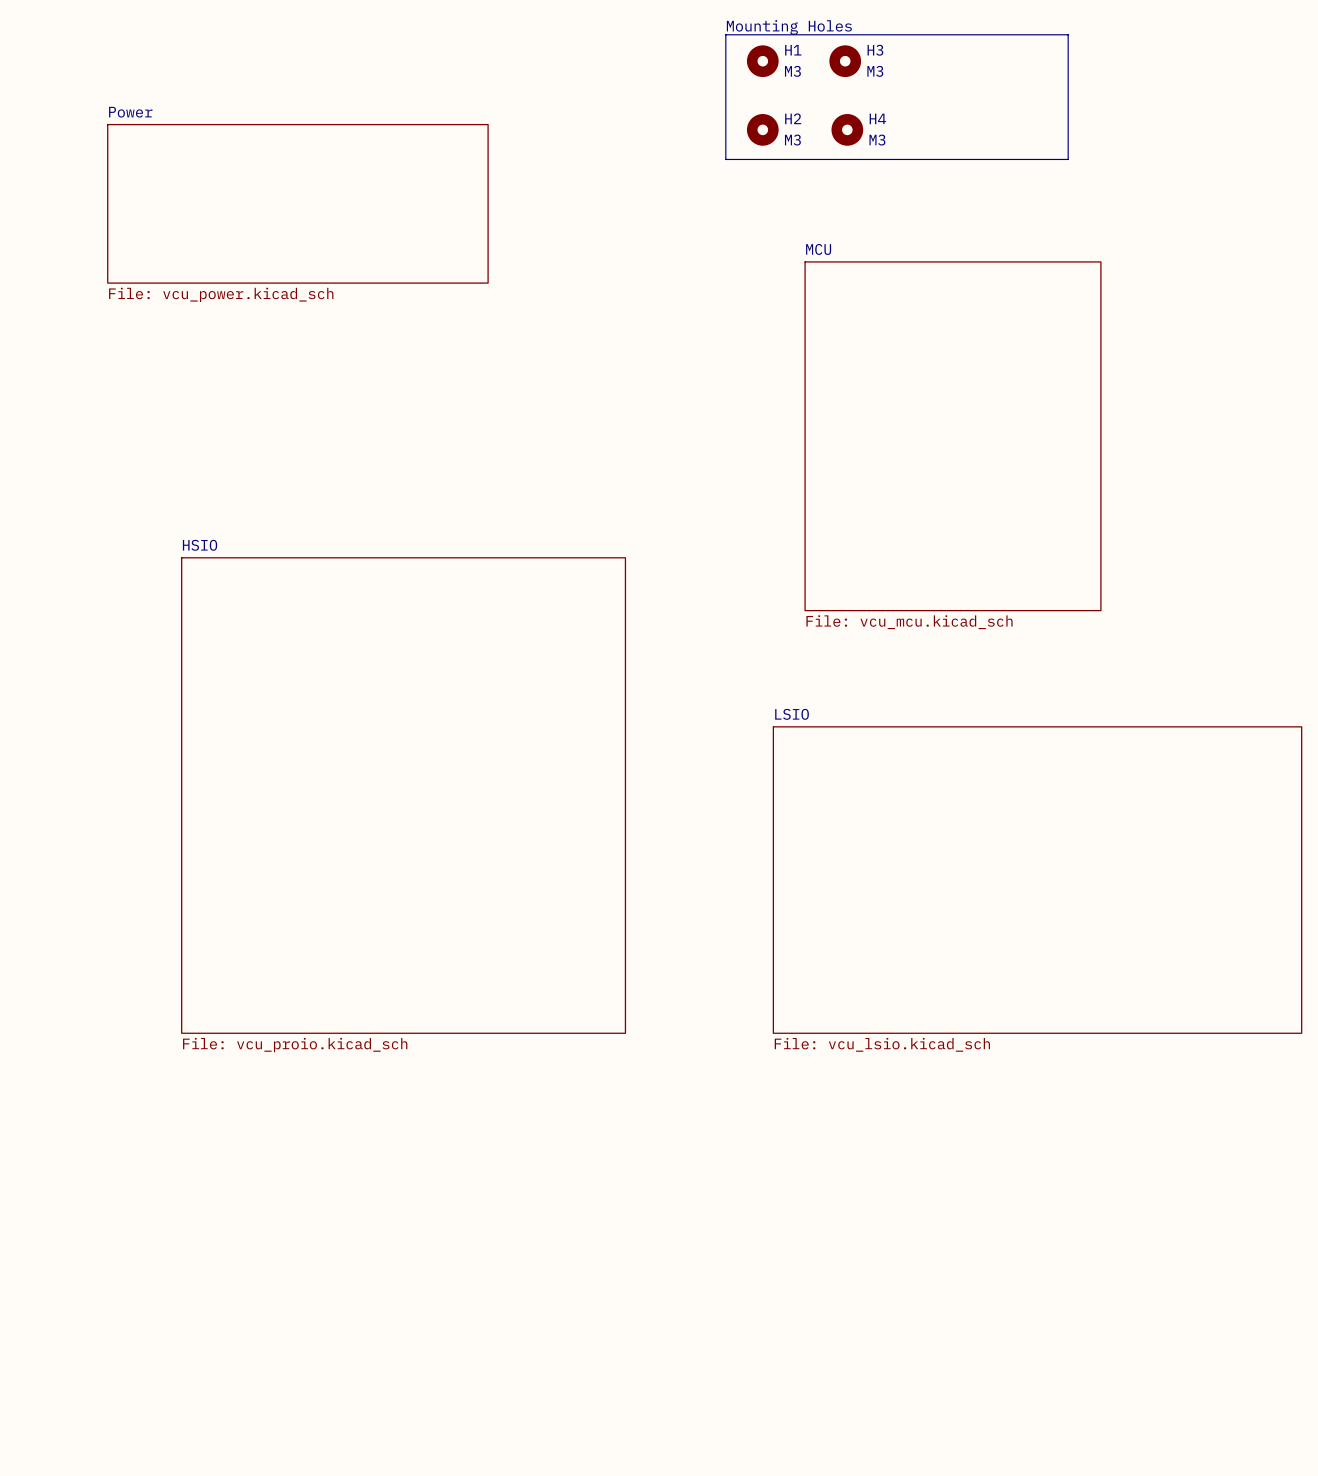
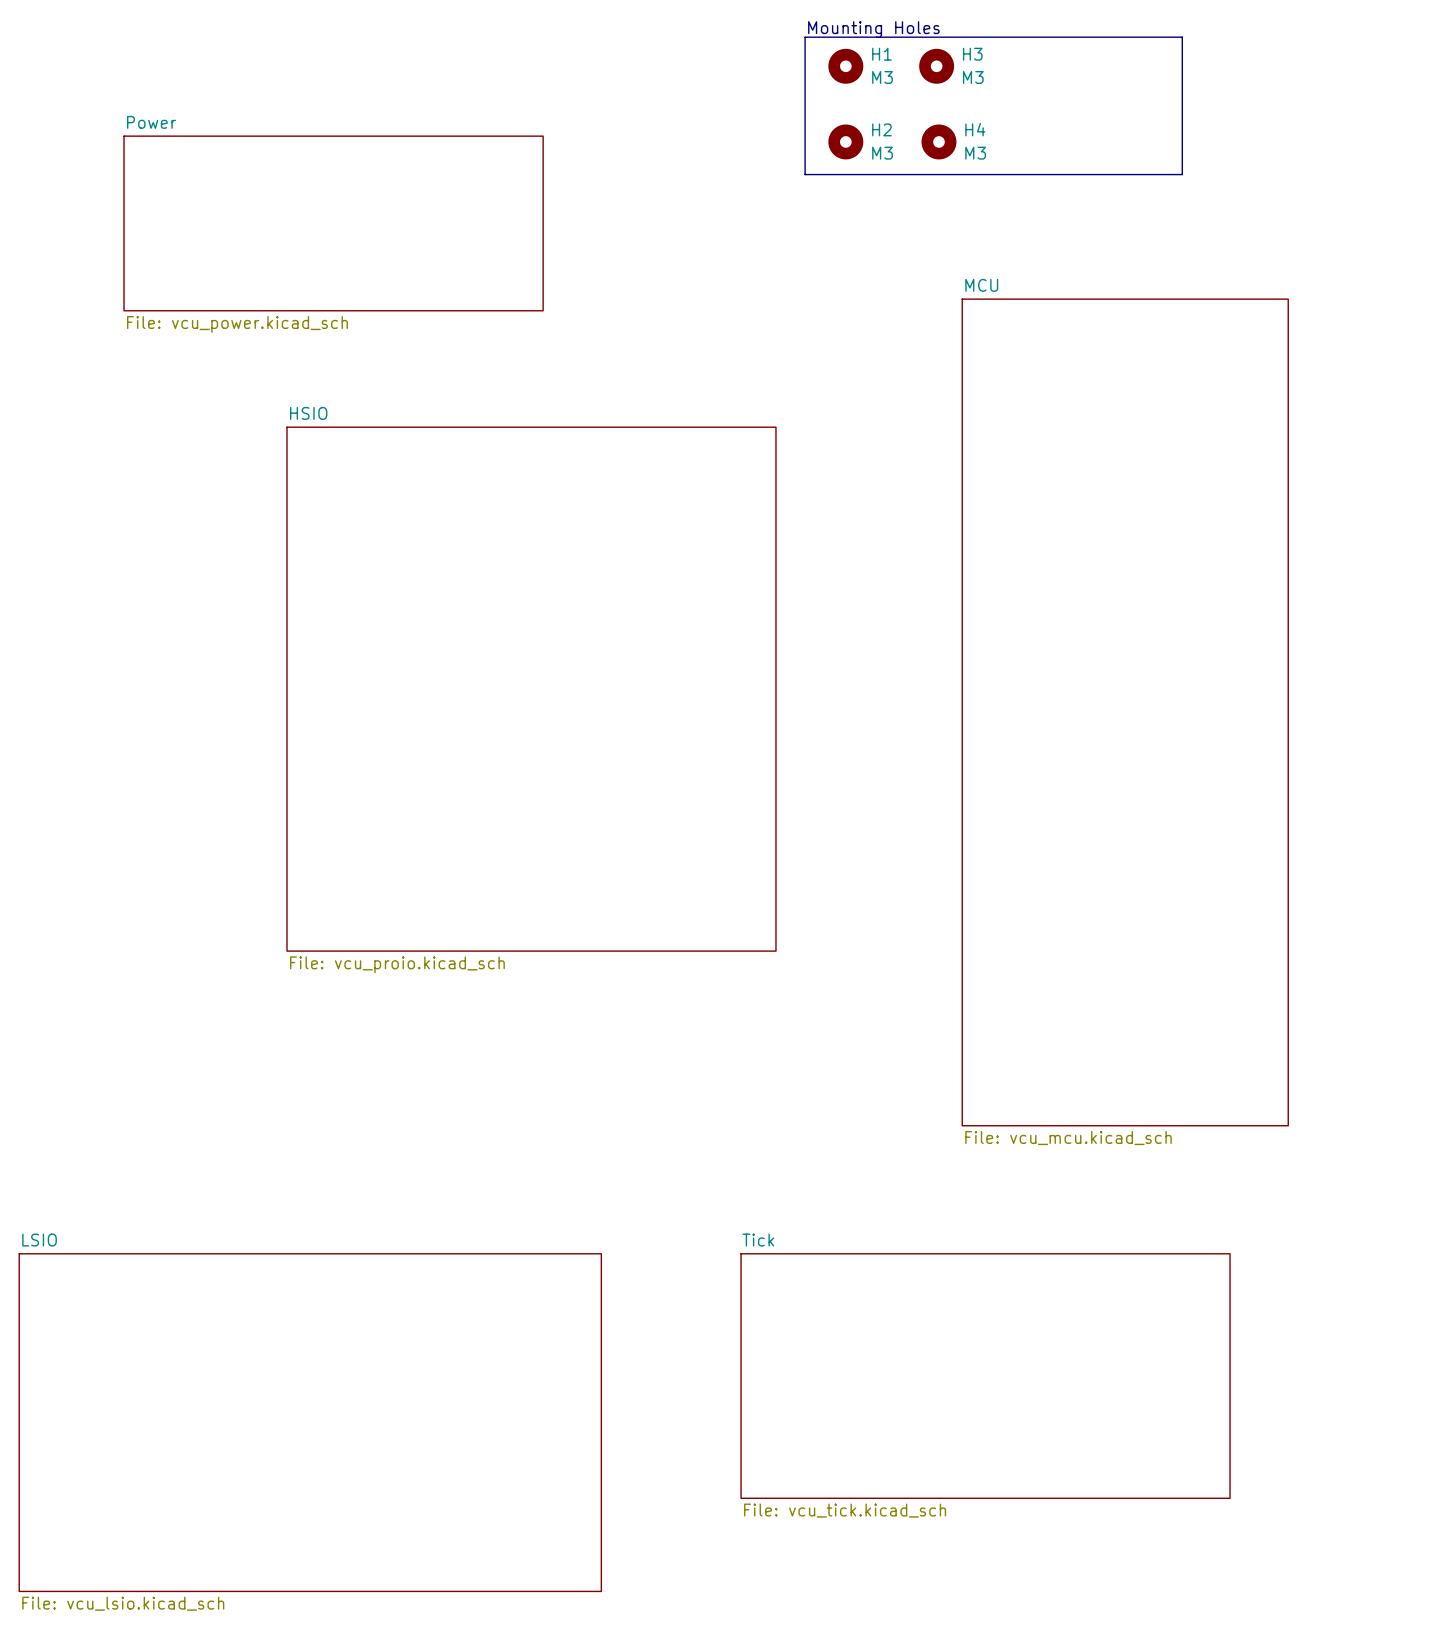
sheet MCU: File: vcu_mcu.kicad_sch (952, 436) -> none
sheet MCU: none -> File: vcu_mcu.kicad_sch (1125, 712)
sheet HSIO position: (403, 795) -> (531, 689)
sheet LSIO: File: vcu_lsio.kicad_sch (1037, 880) -> none
sheet Tick: none -> File: vcu_tick.kicad_sch (985, 1376)
sheet LSIO: none -> File: vcu_lsio.kicad_sch (310, 1422)

